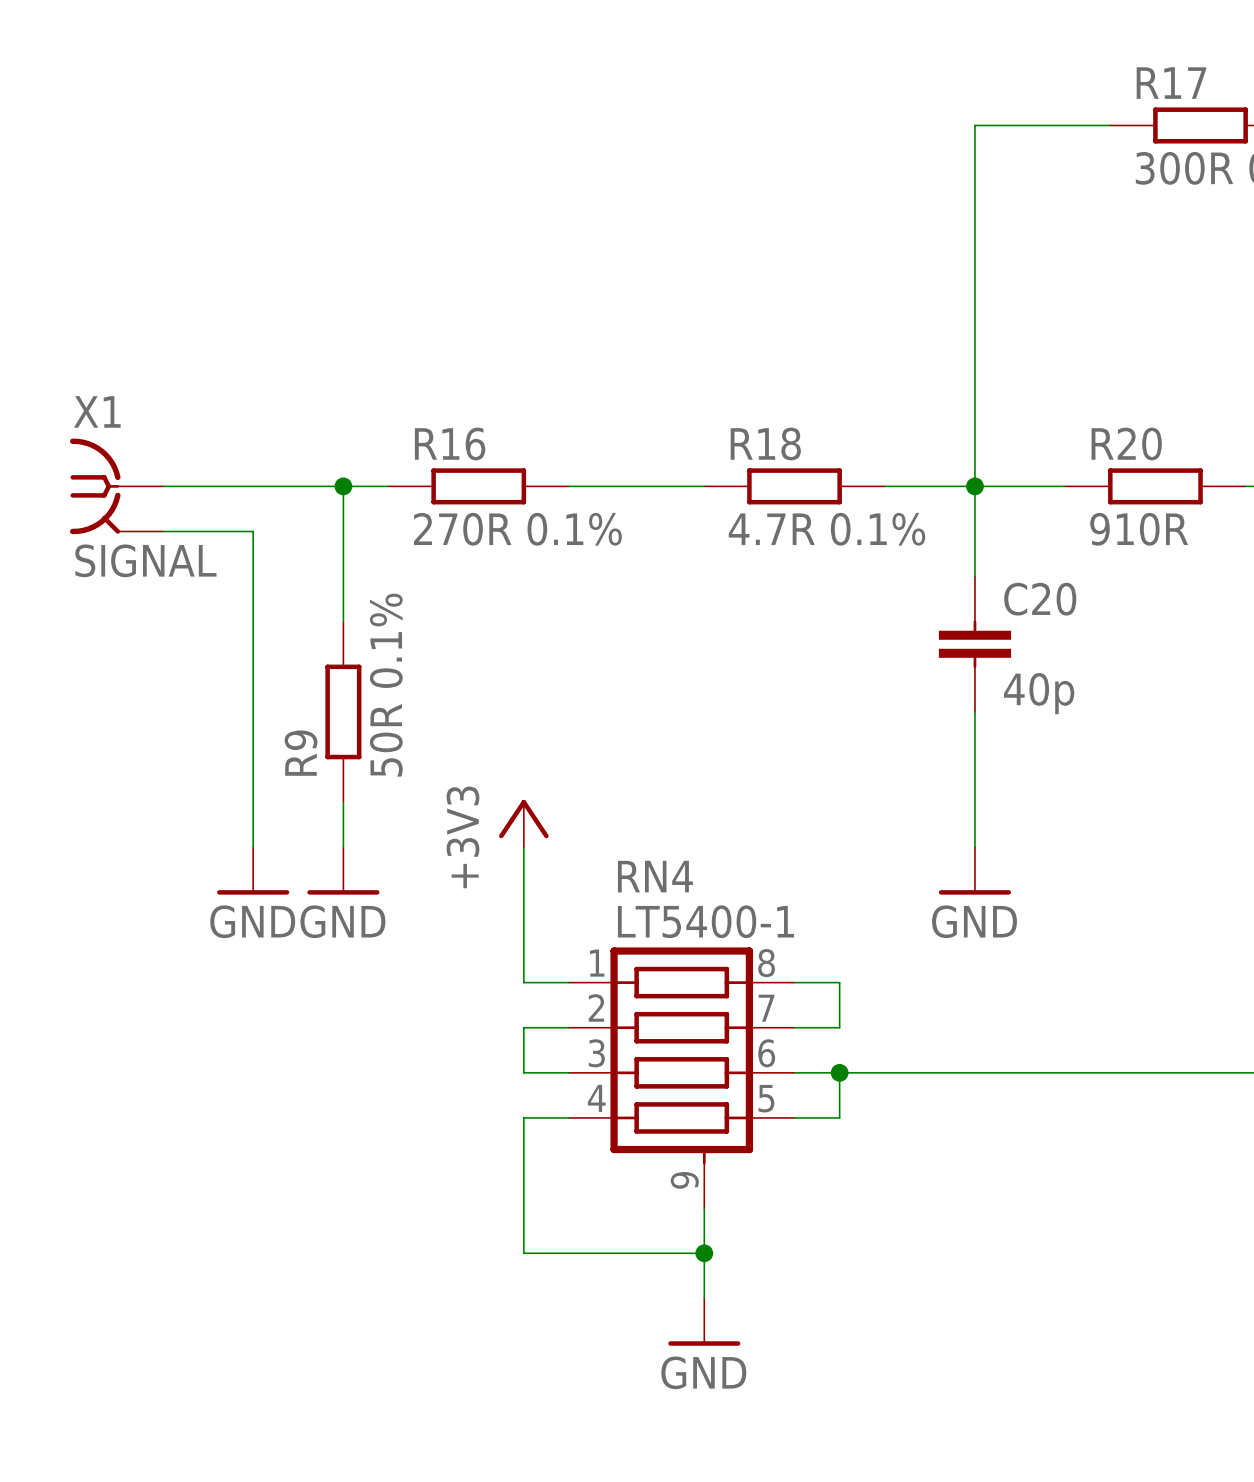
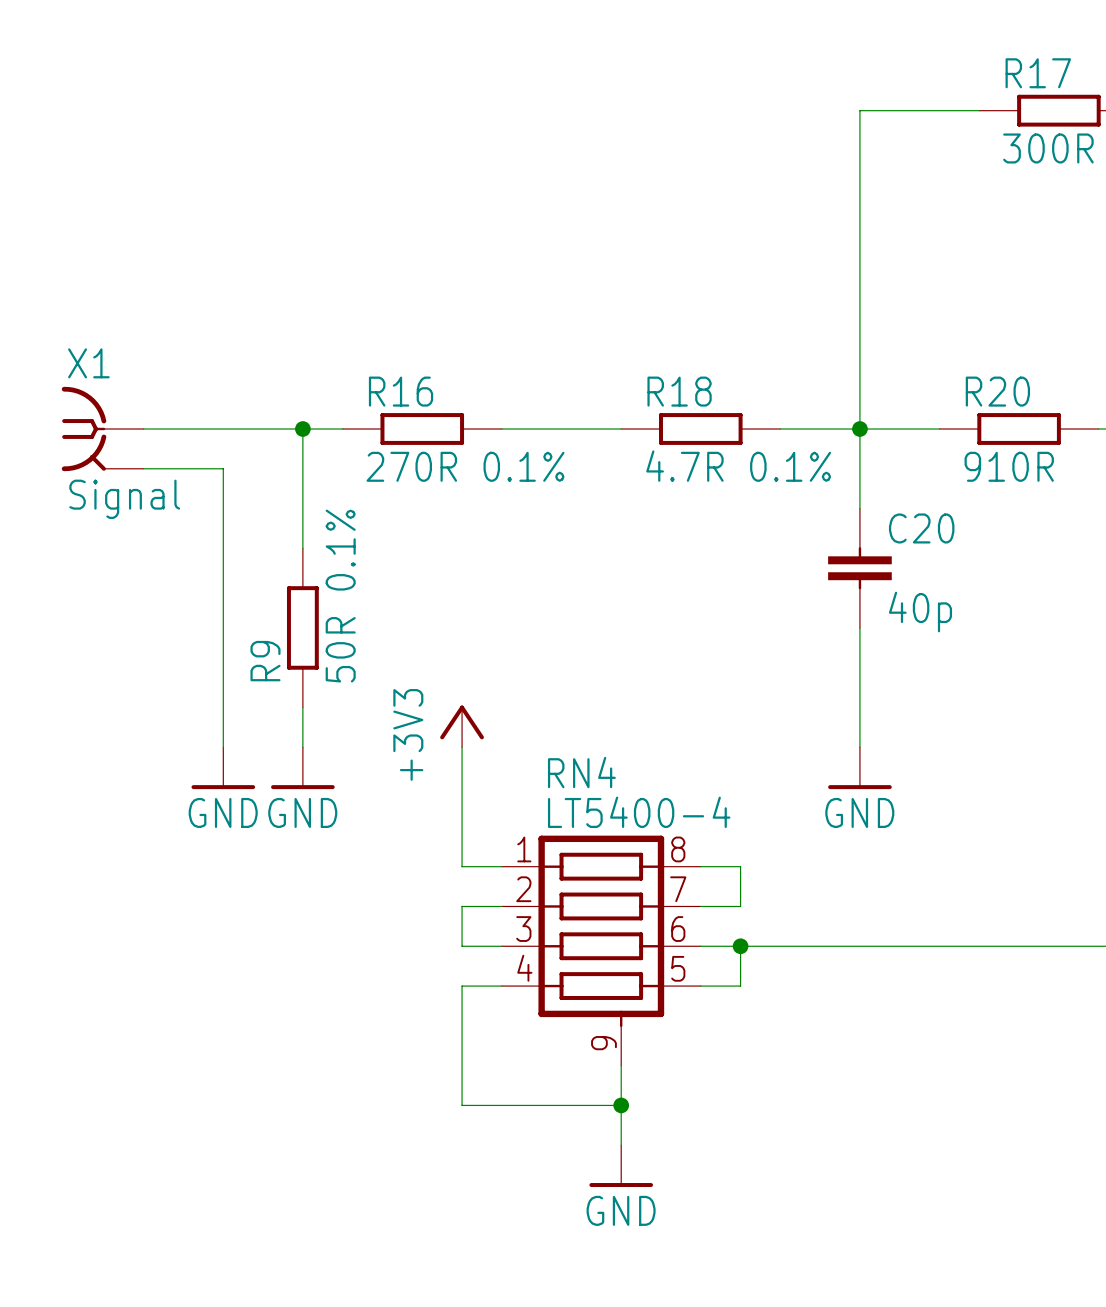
X1 value: SIGNAL (145, 560) -> Signal (124, 499)
RN4 value: LT5400-1 (705, 921) -> LT5400-4 (639, 812)

